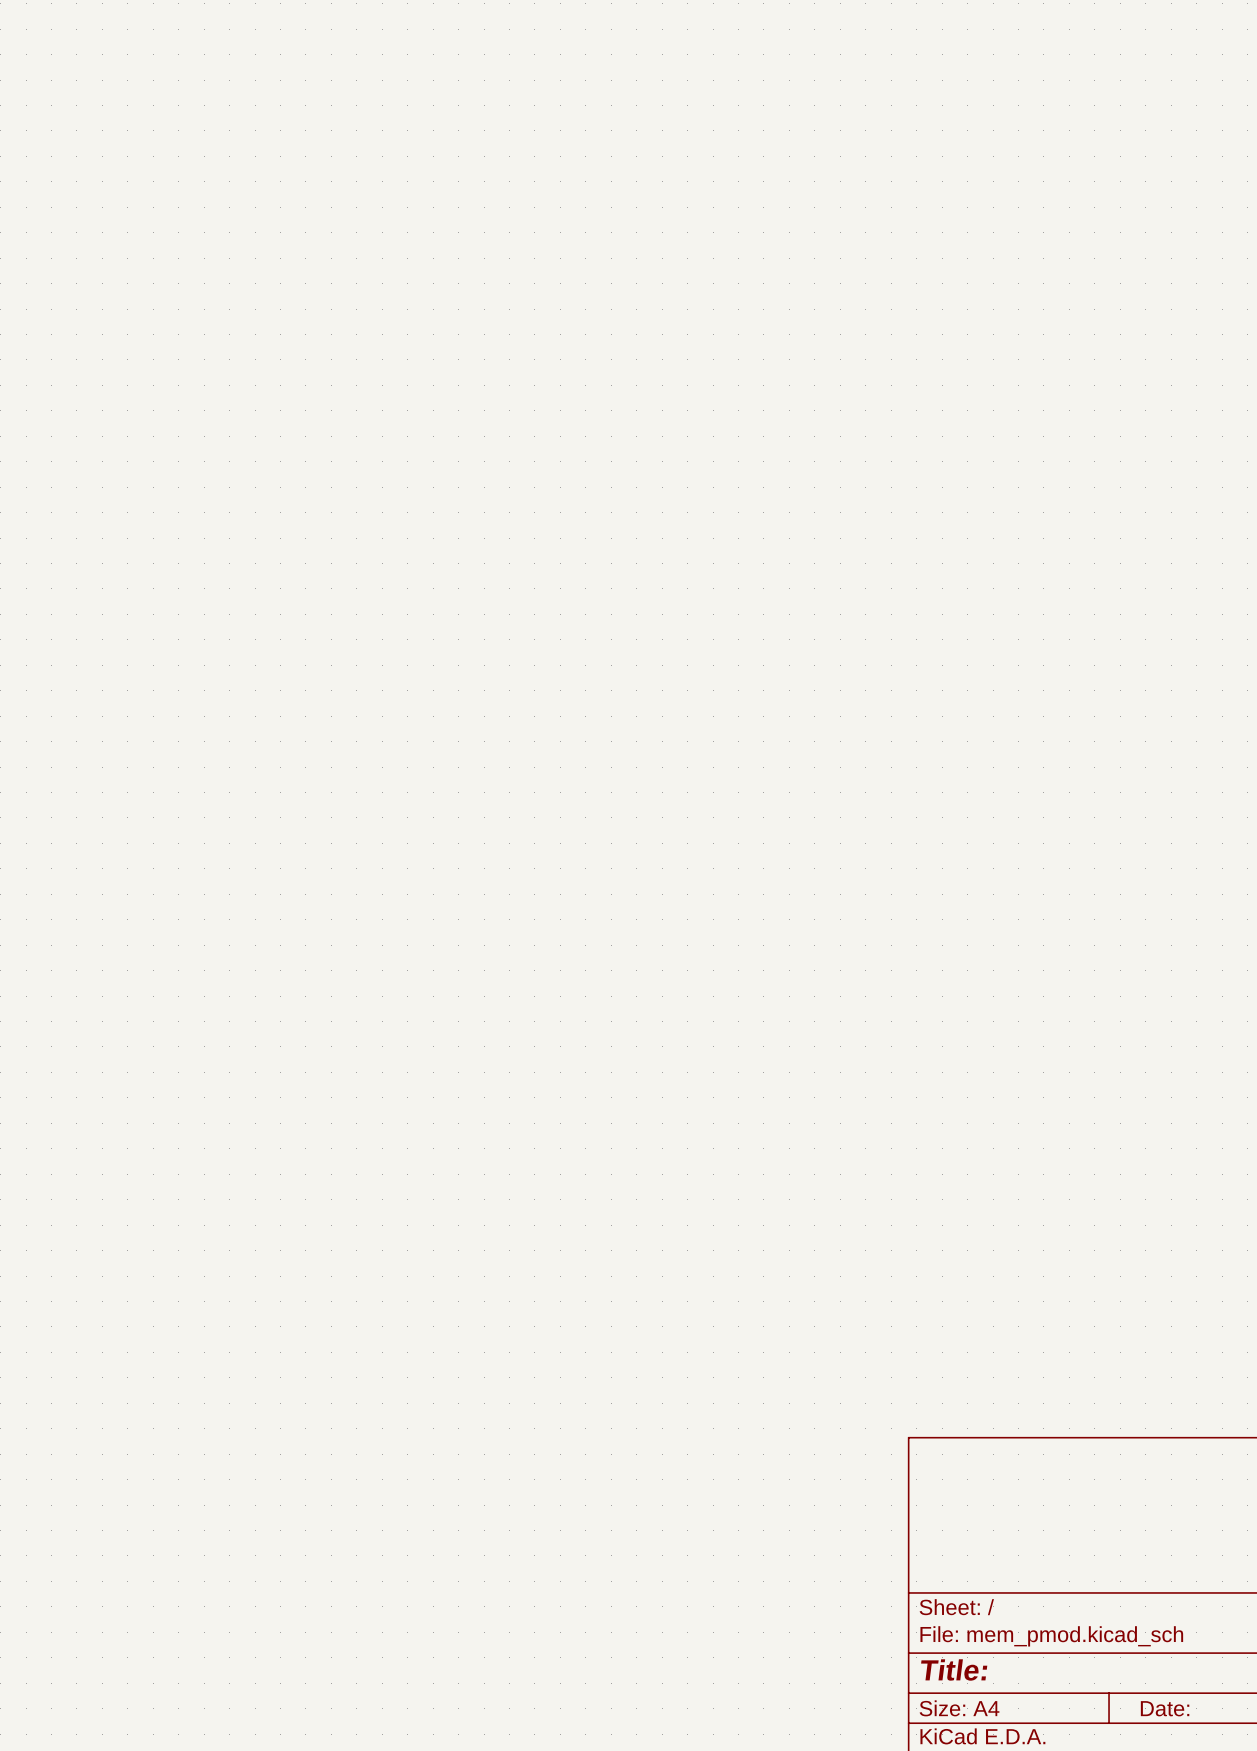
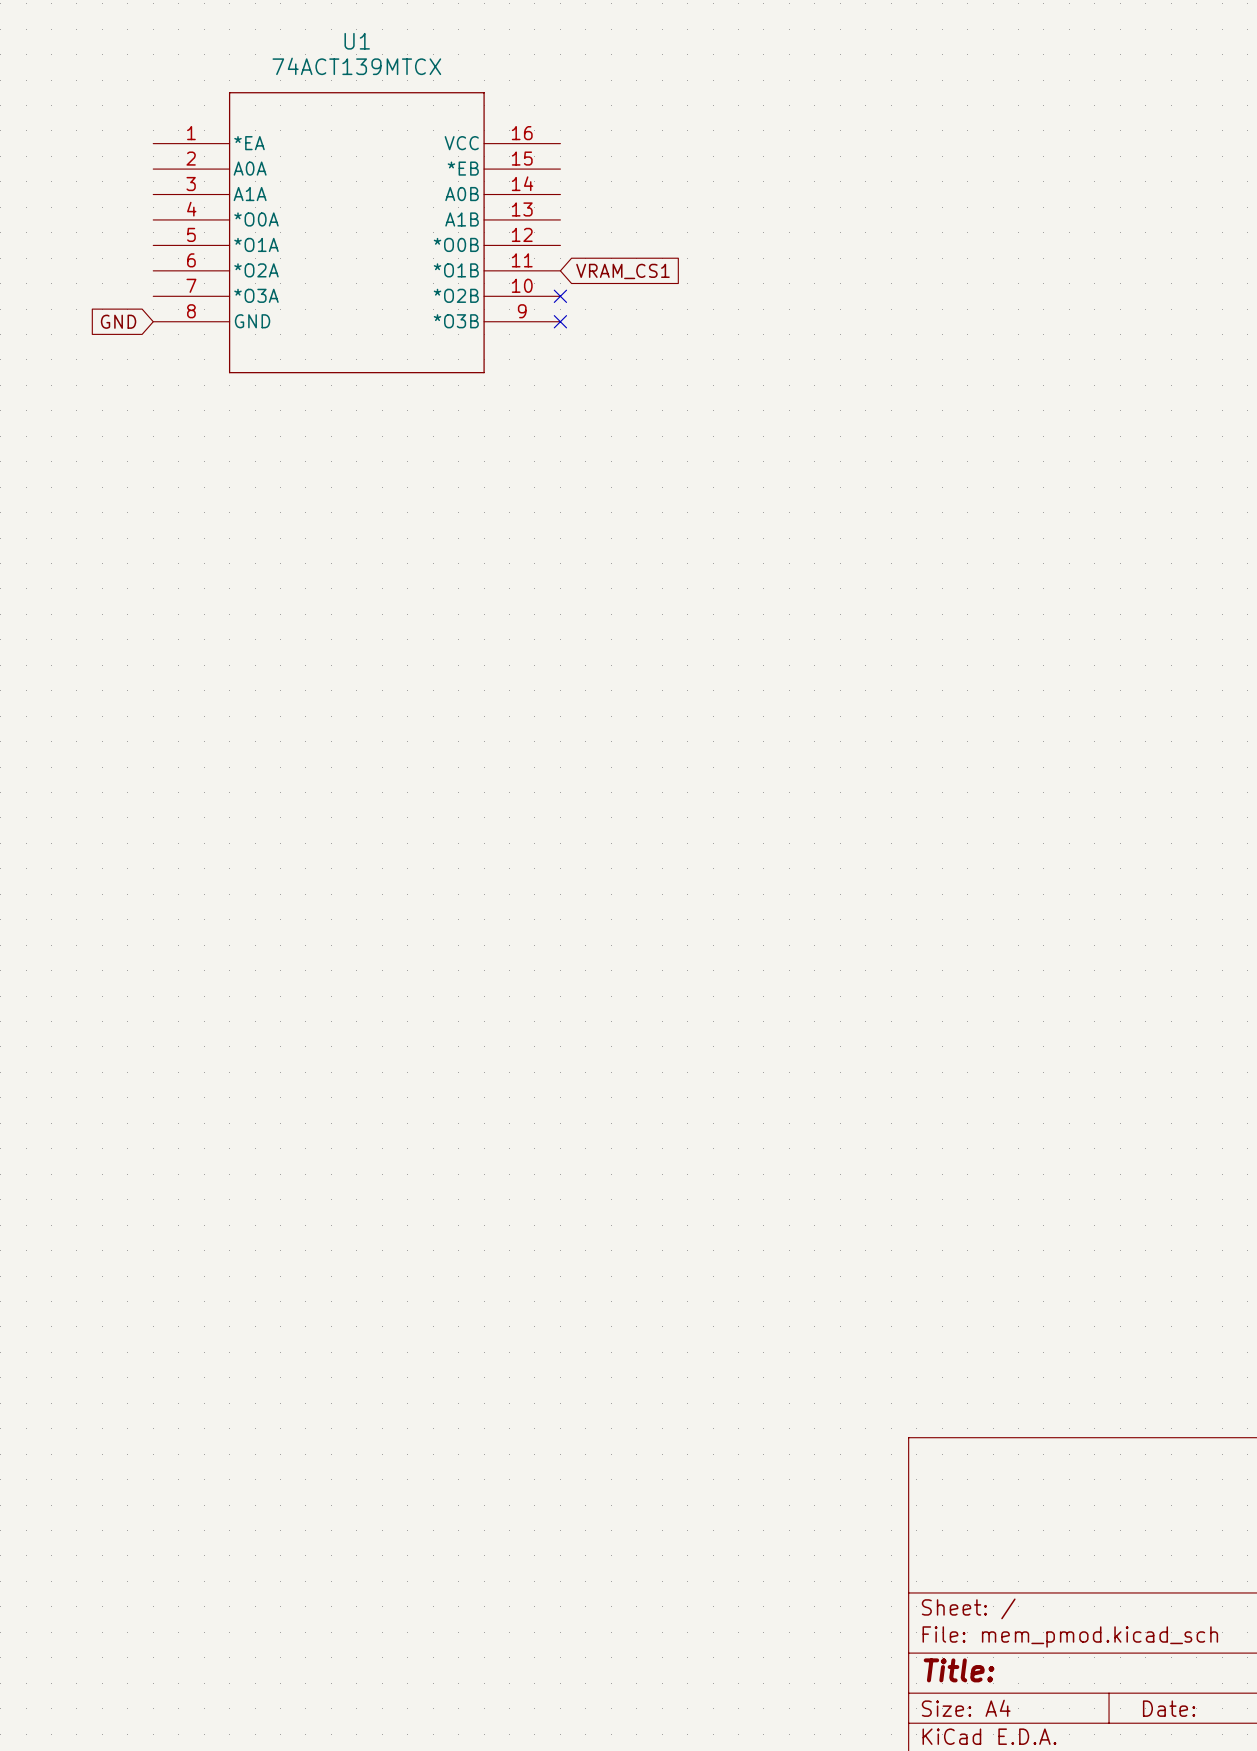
U1: none -> 74ACT139MTCX (356, 232)
global label: none -> VRAM_CS1 (622, 271)
no-connect mark: none -> (560, 296)
global label: none -> GND (118, 321)
no-connect mark: none -> (560, 321)

